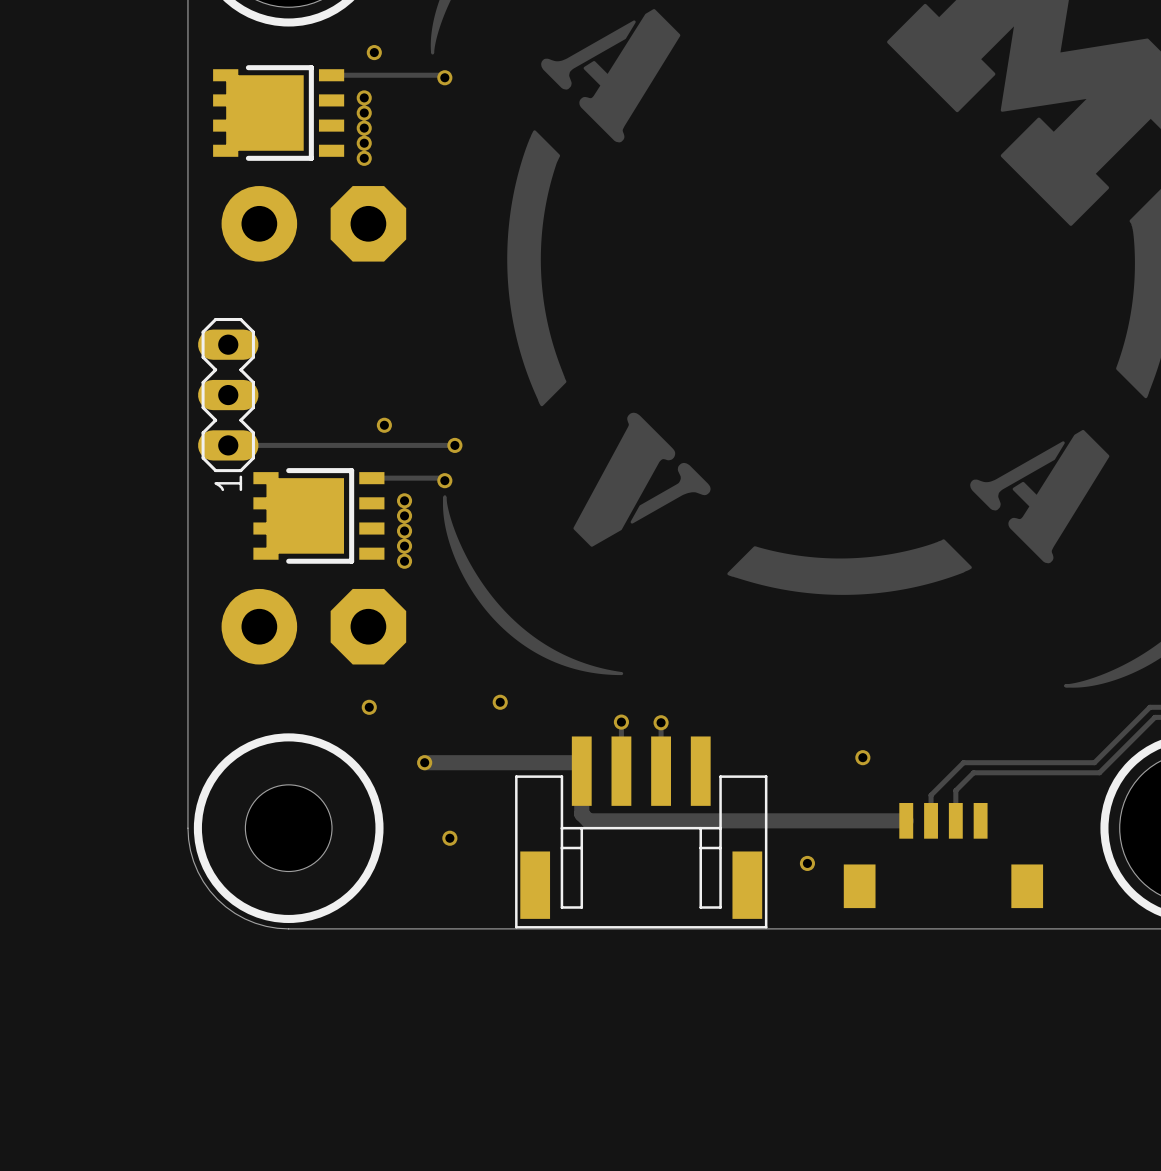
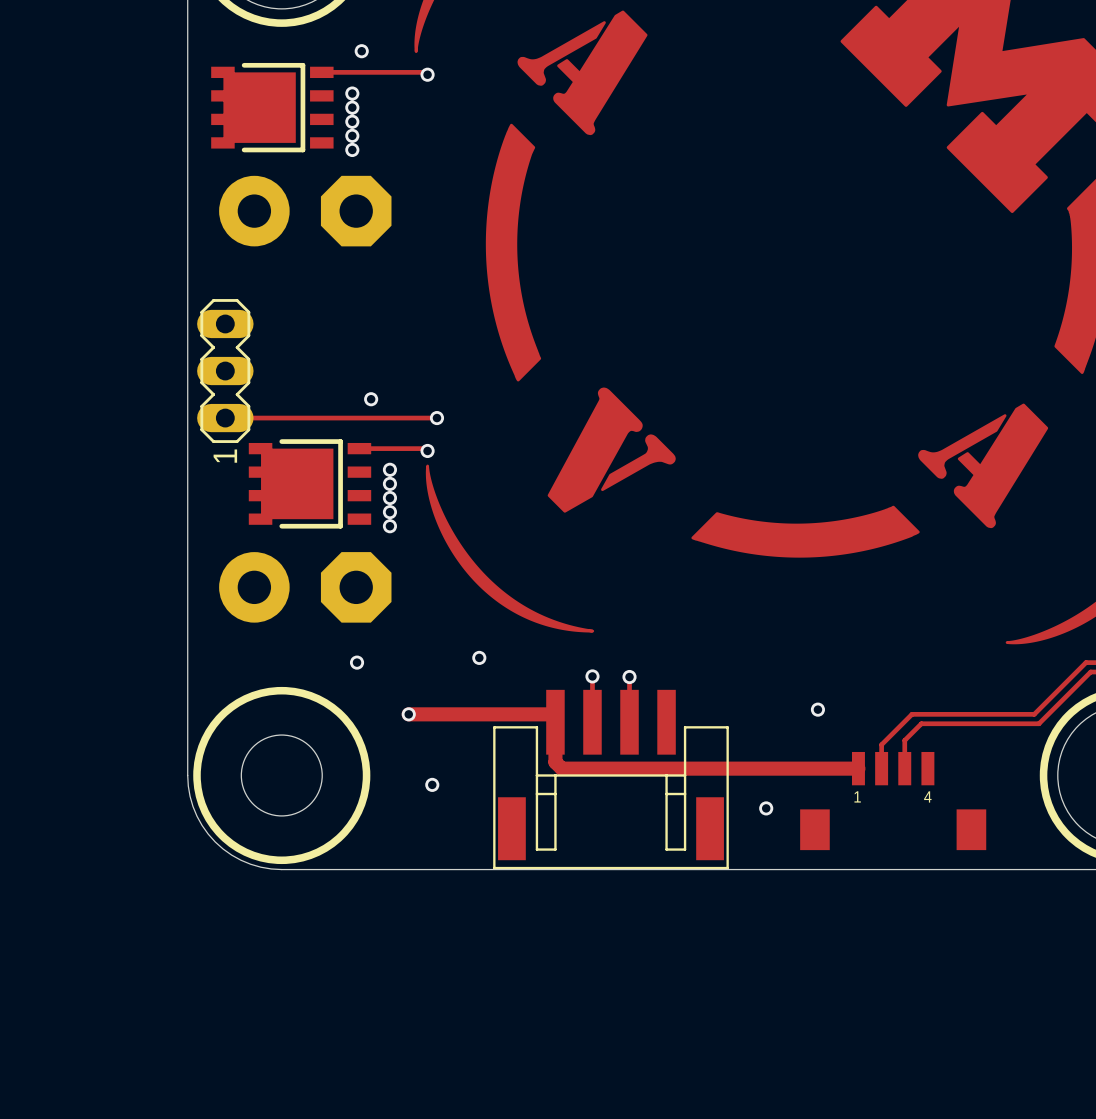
part text: none -> 4 (927, 796)
part text: none -> 1 (857, 796)

